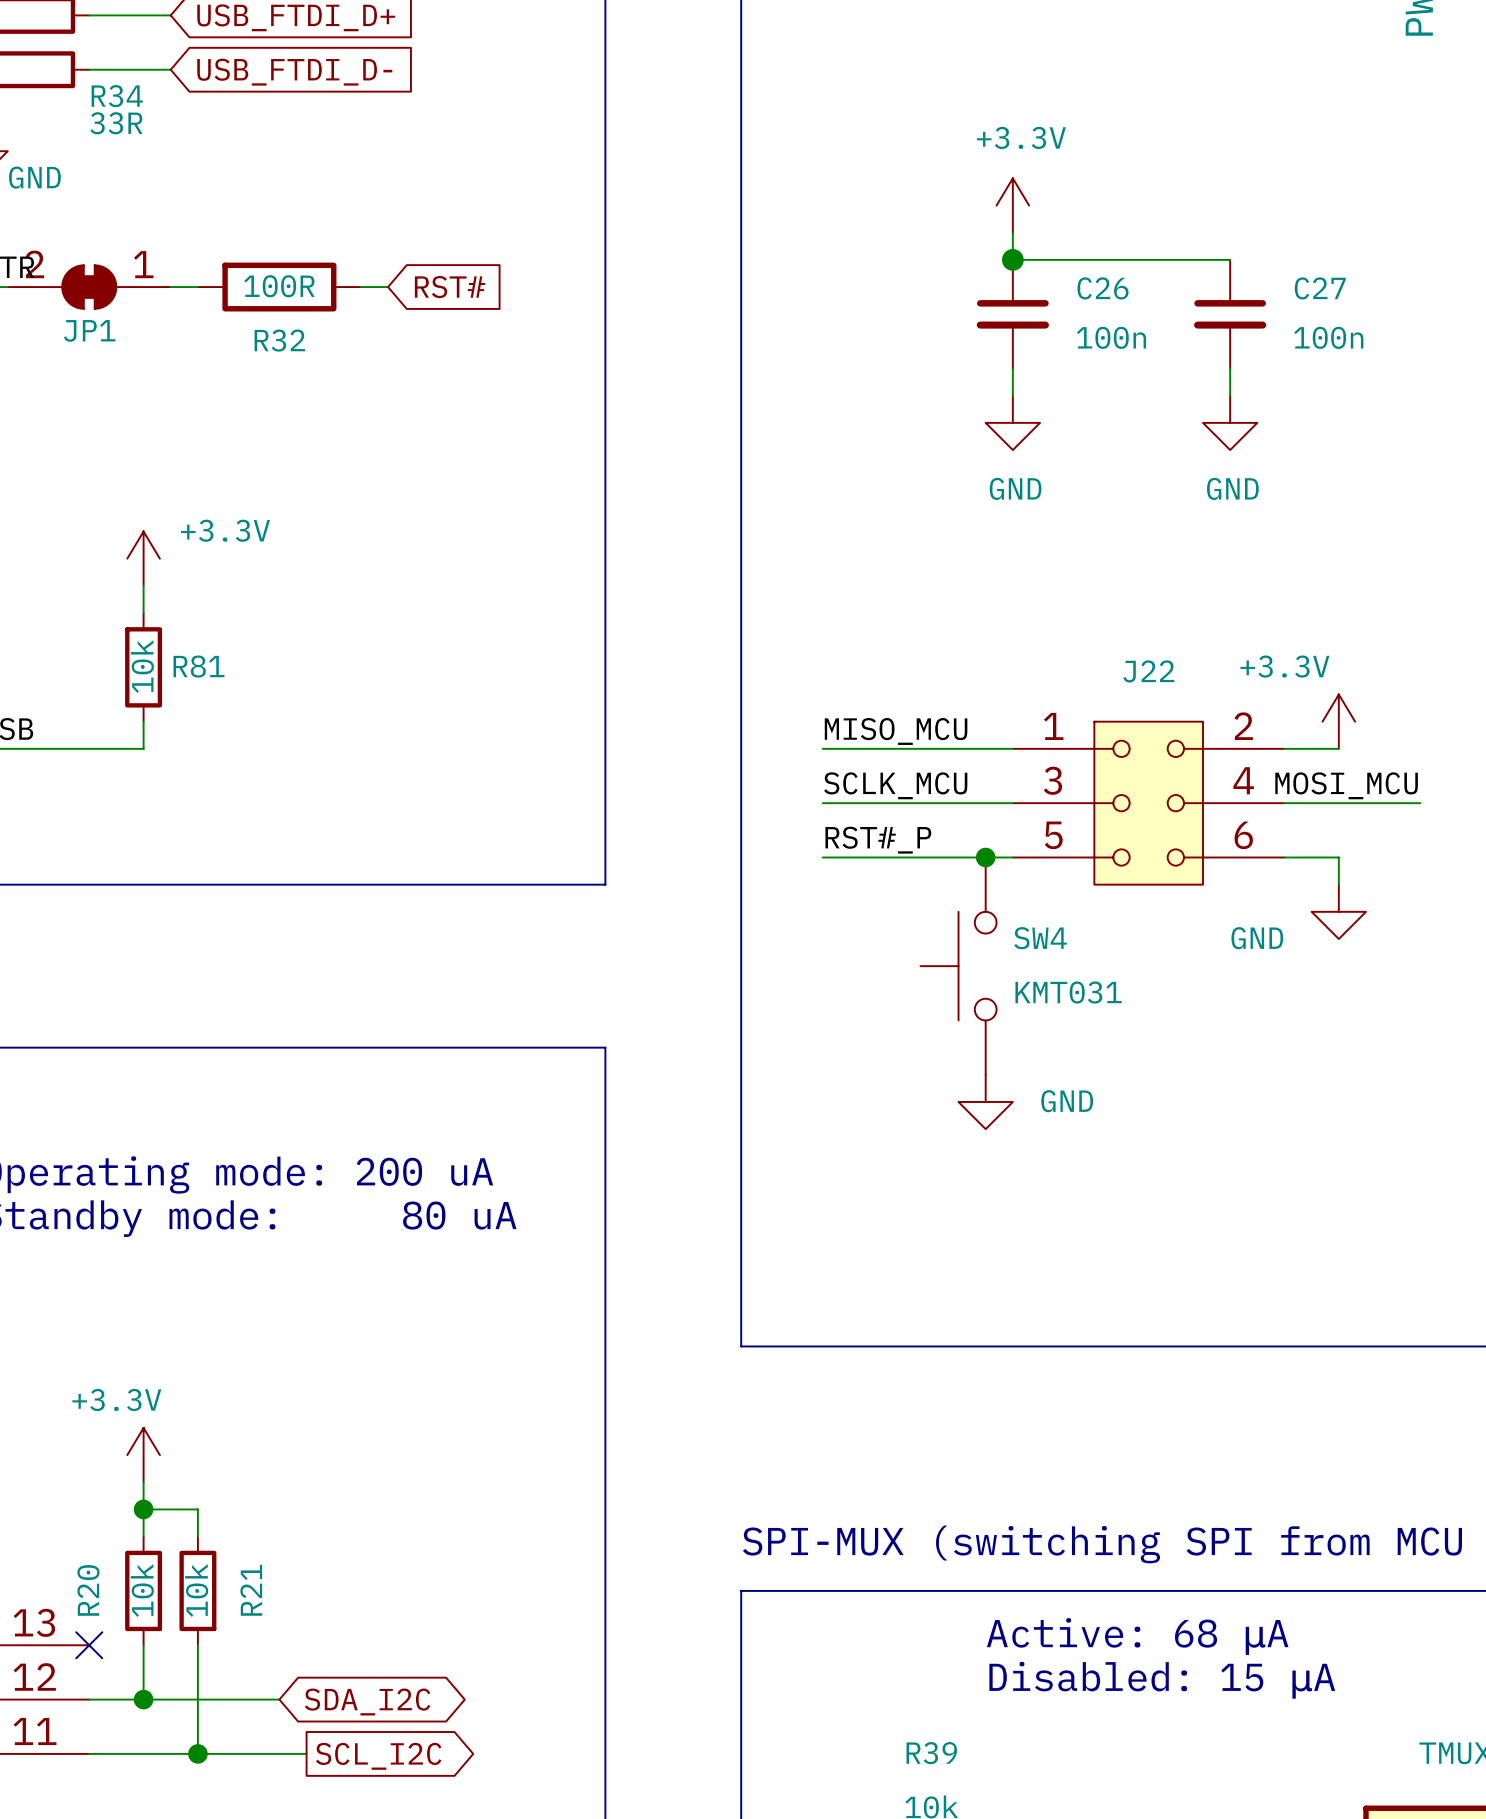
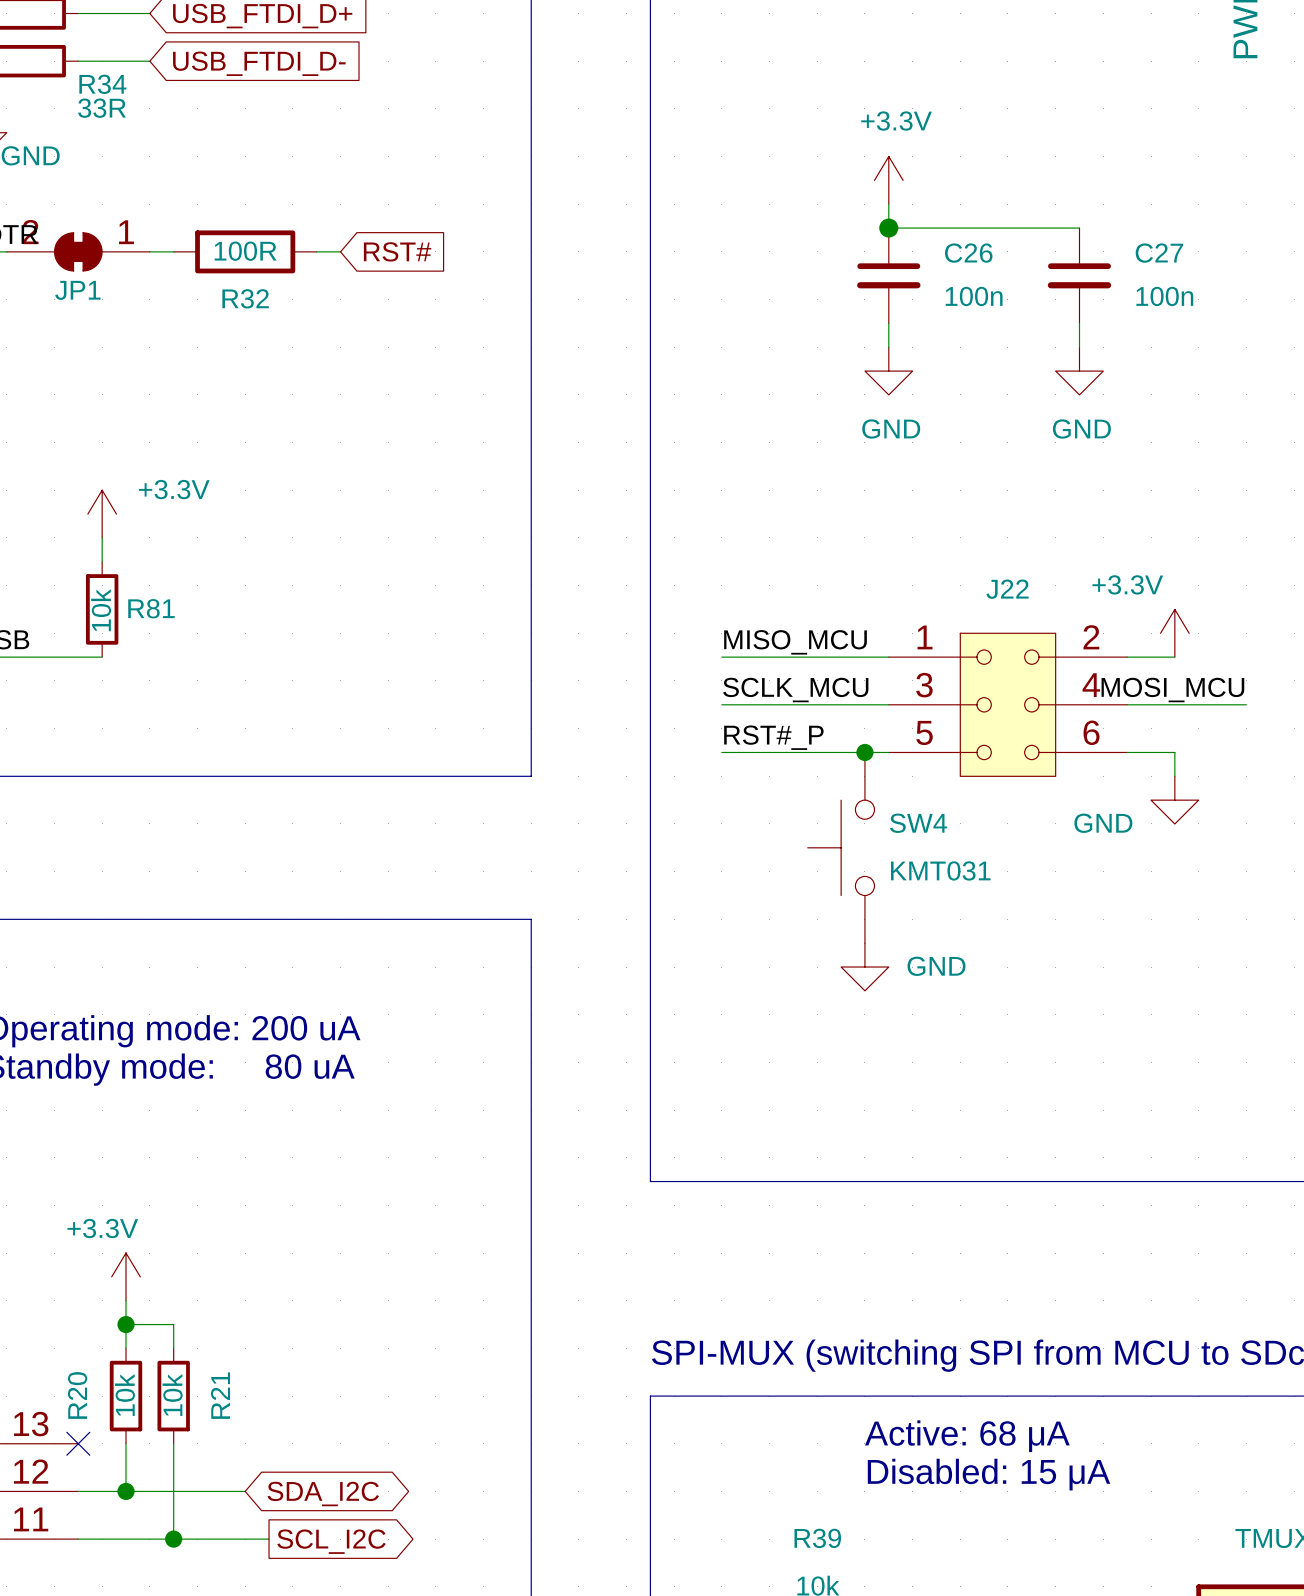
power symbol position: +3.3V (143, 558) -> +3.3V (102, 514)
wire: (143, 585) (143, 613) -> (102, 537) (102, 561)
R81 position: (143, 667) -> (102, 609)
wire: (143, 721) (143, 748) (116, 748) -> none

